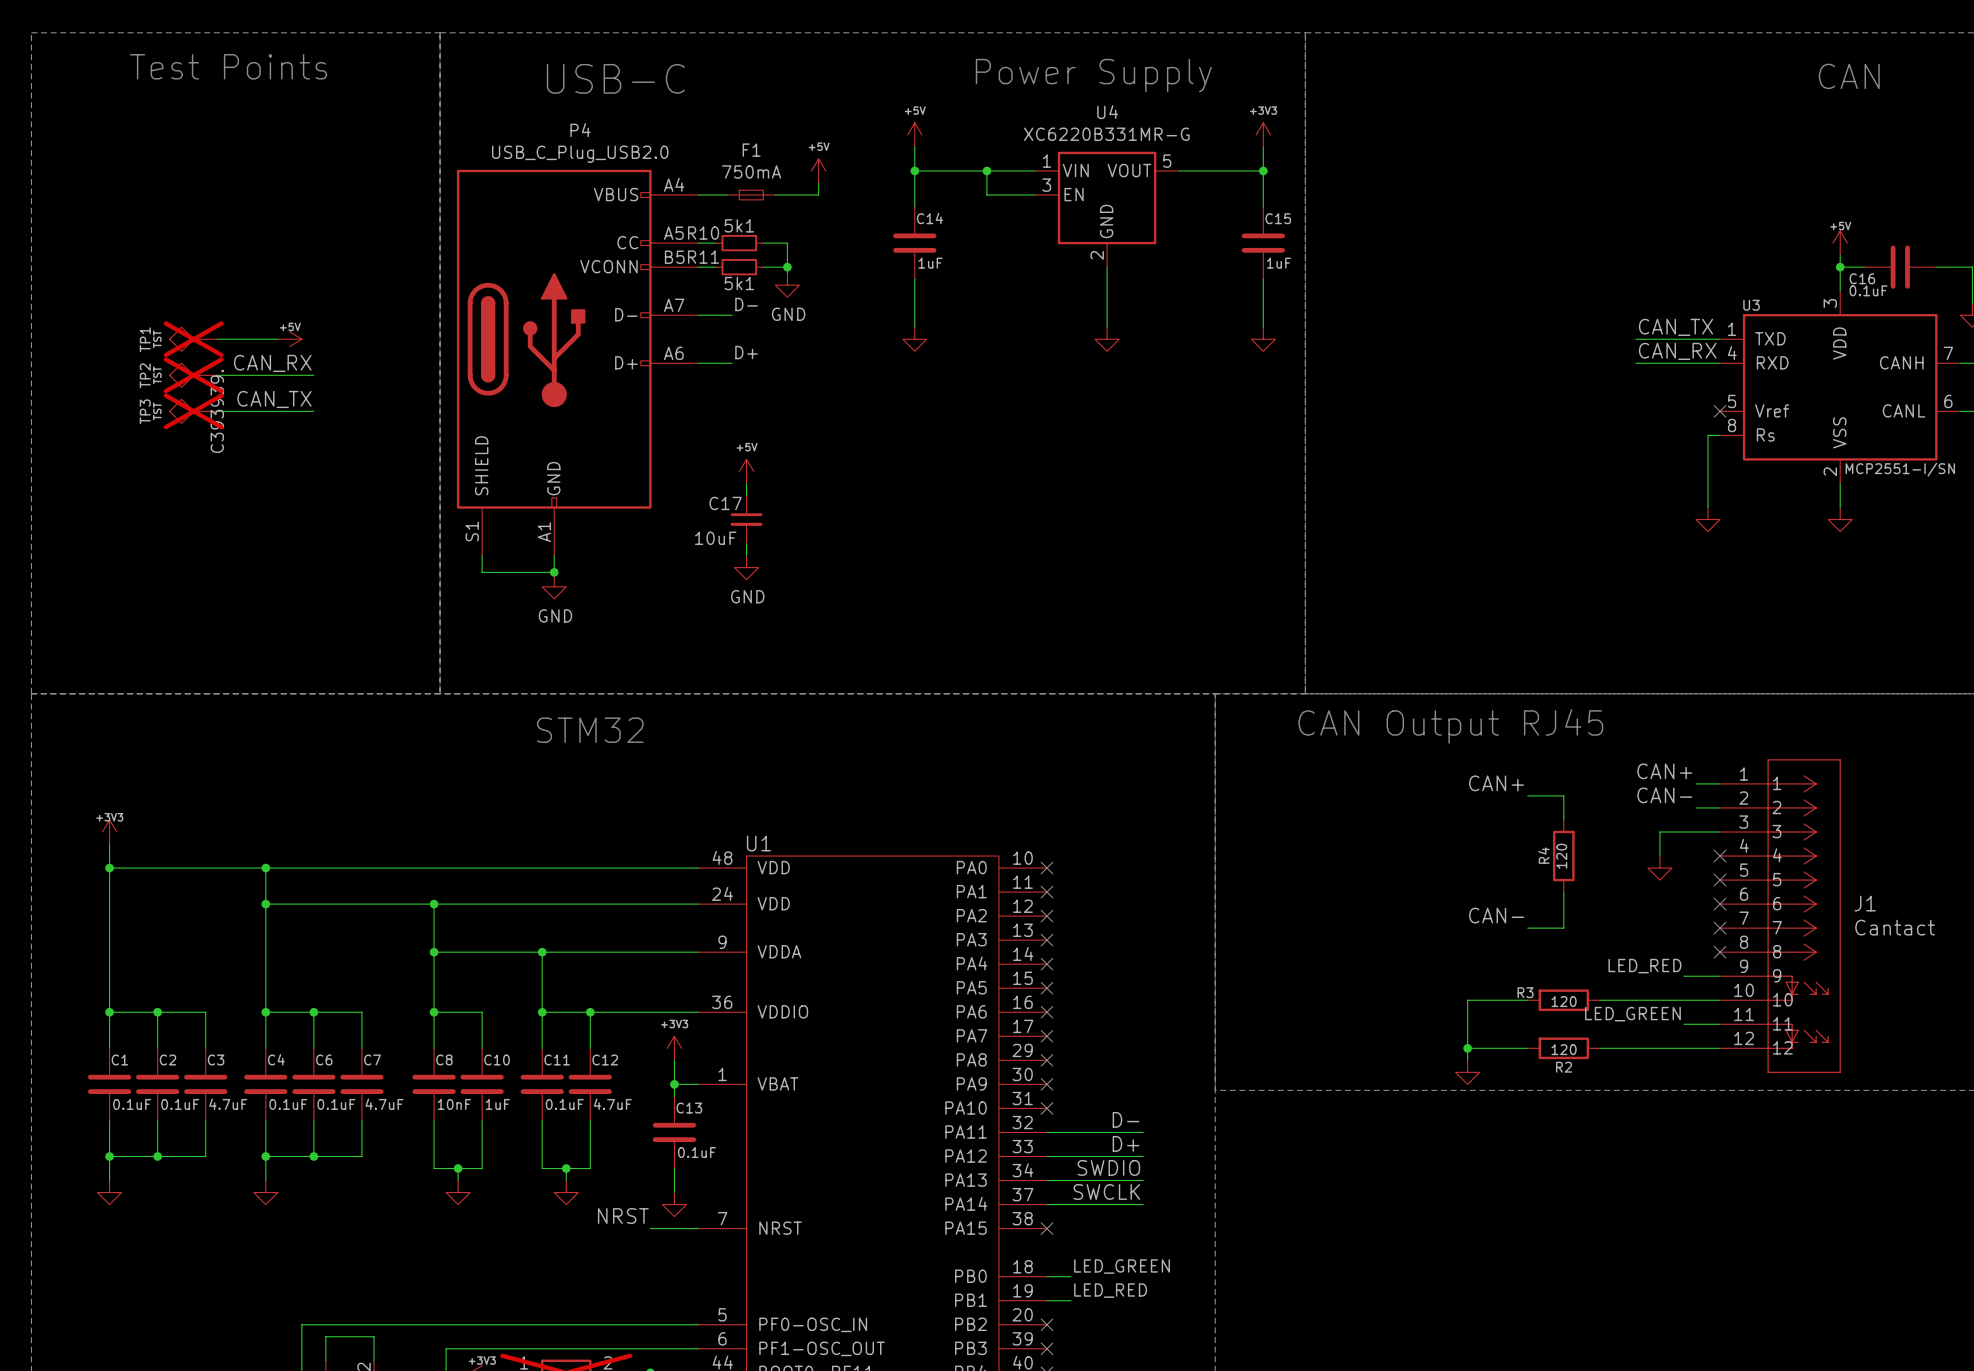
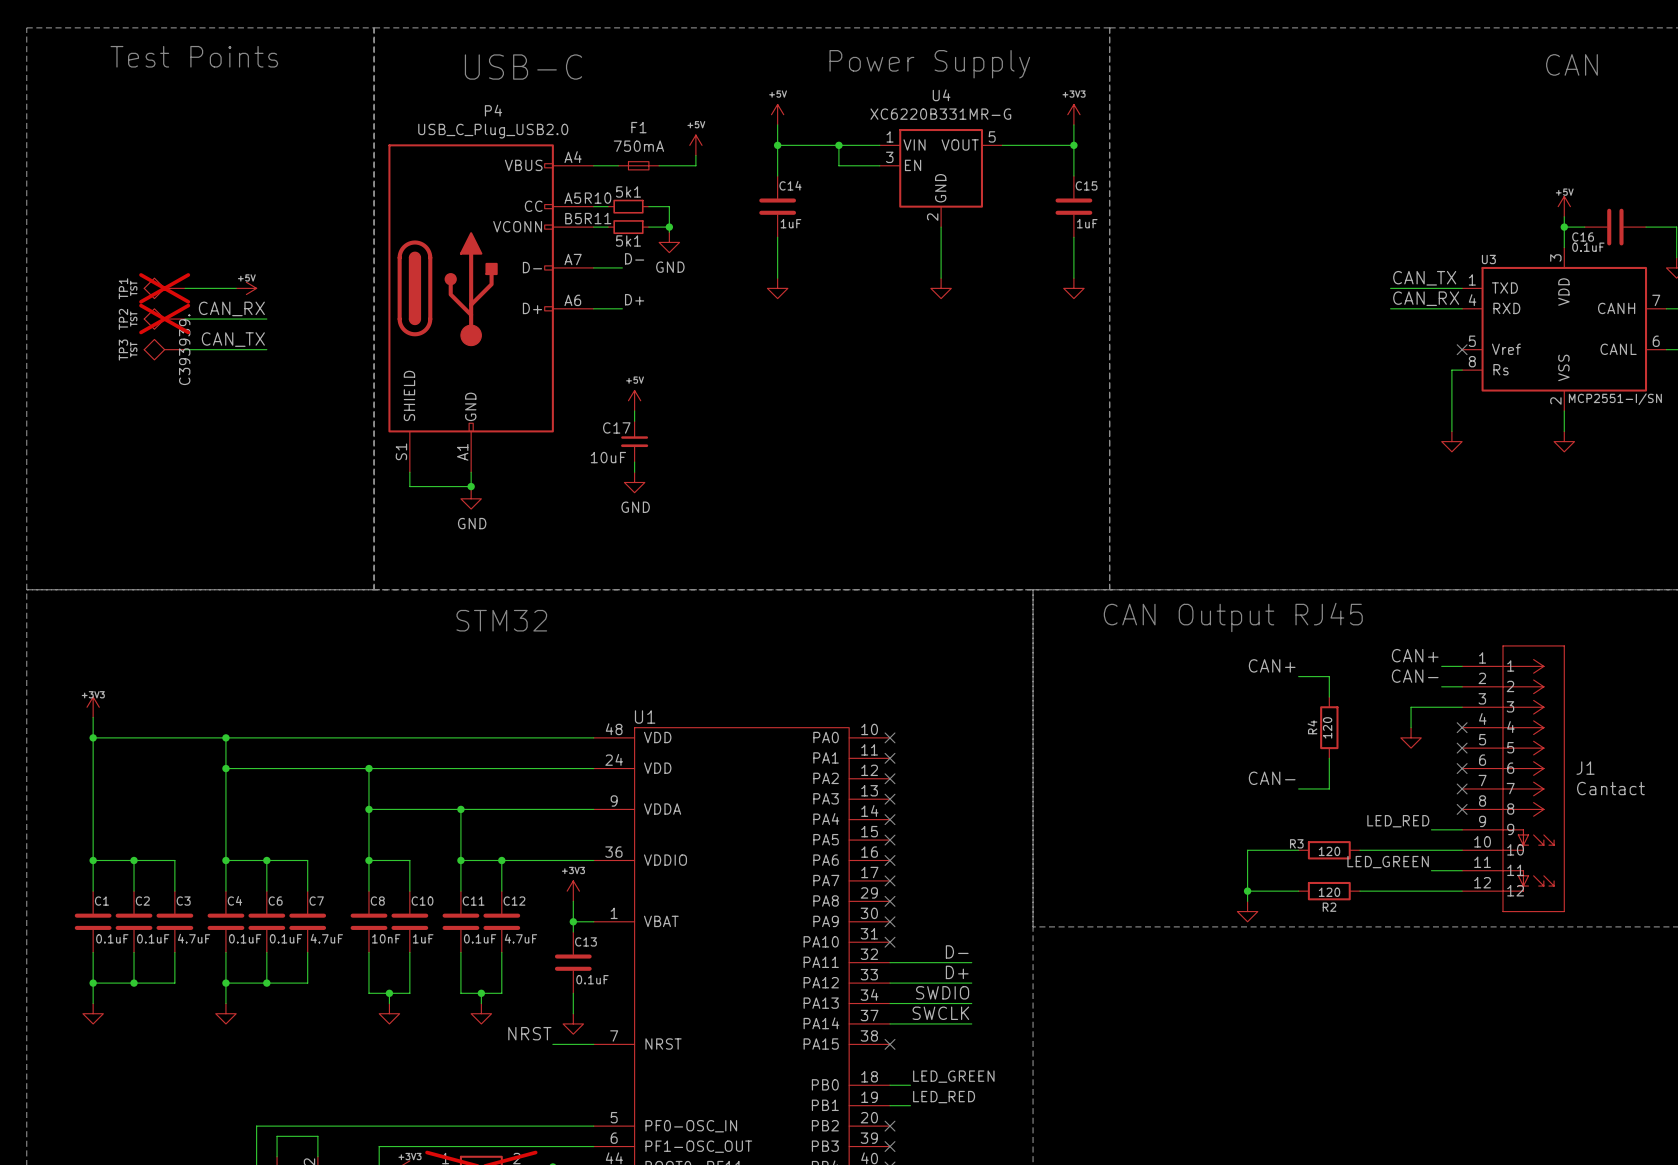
TP3 do-not-place cross: (193, 411) -> none

